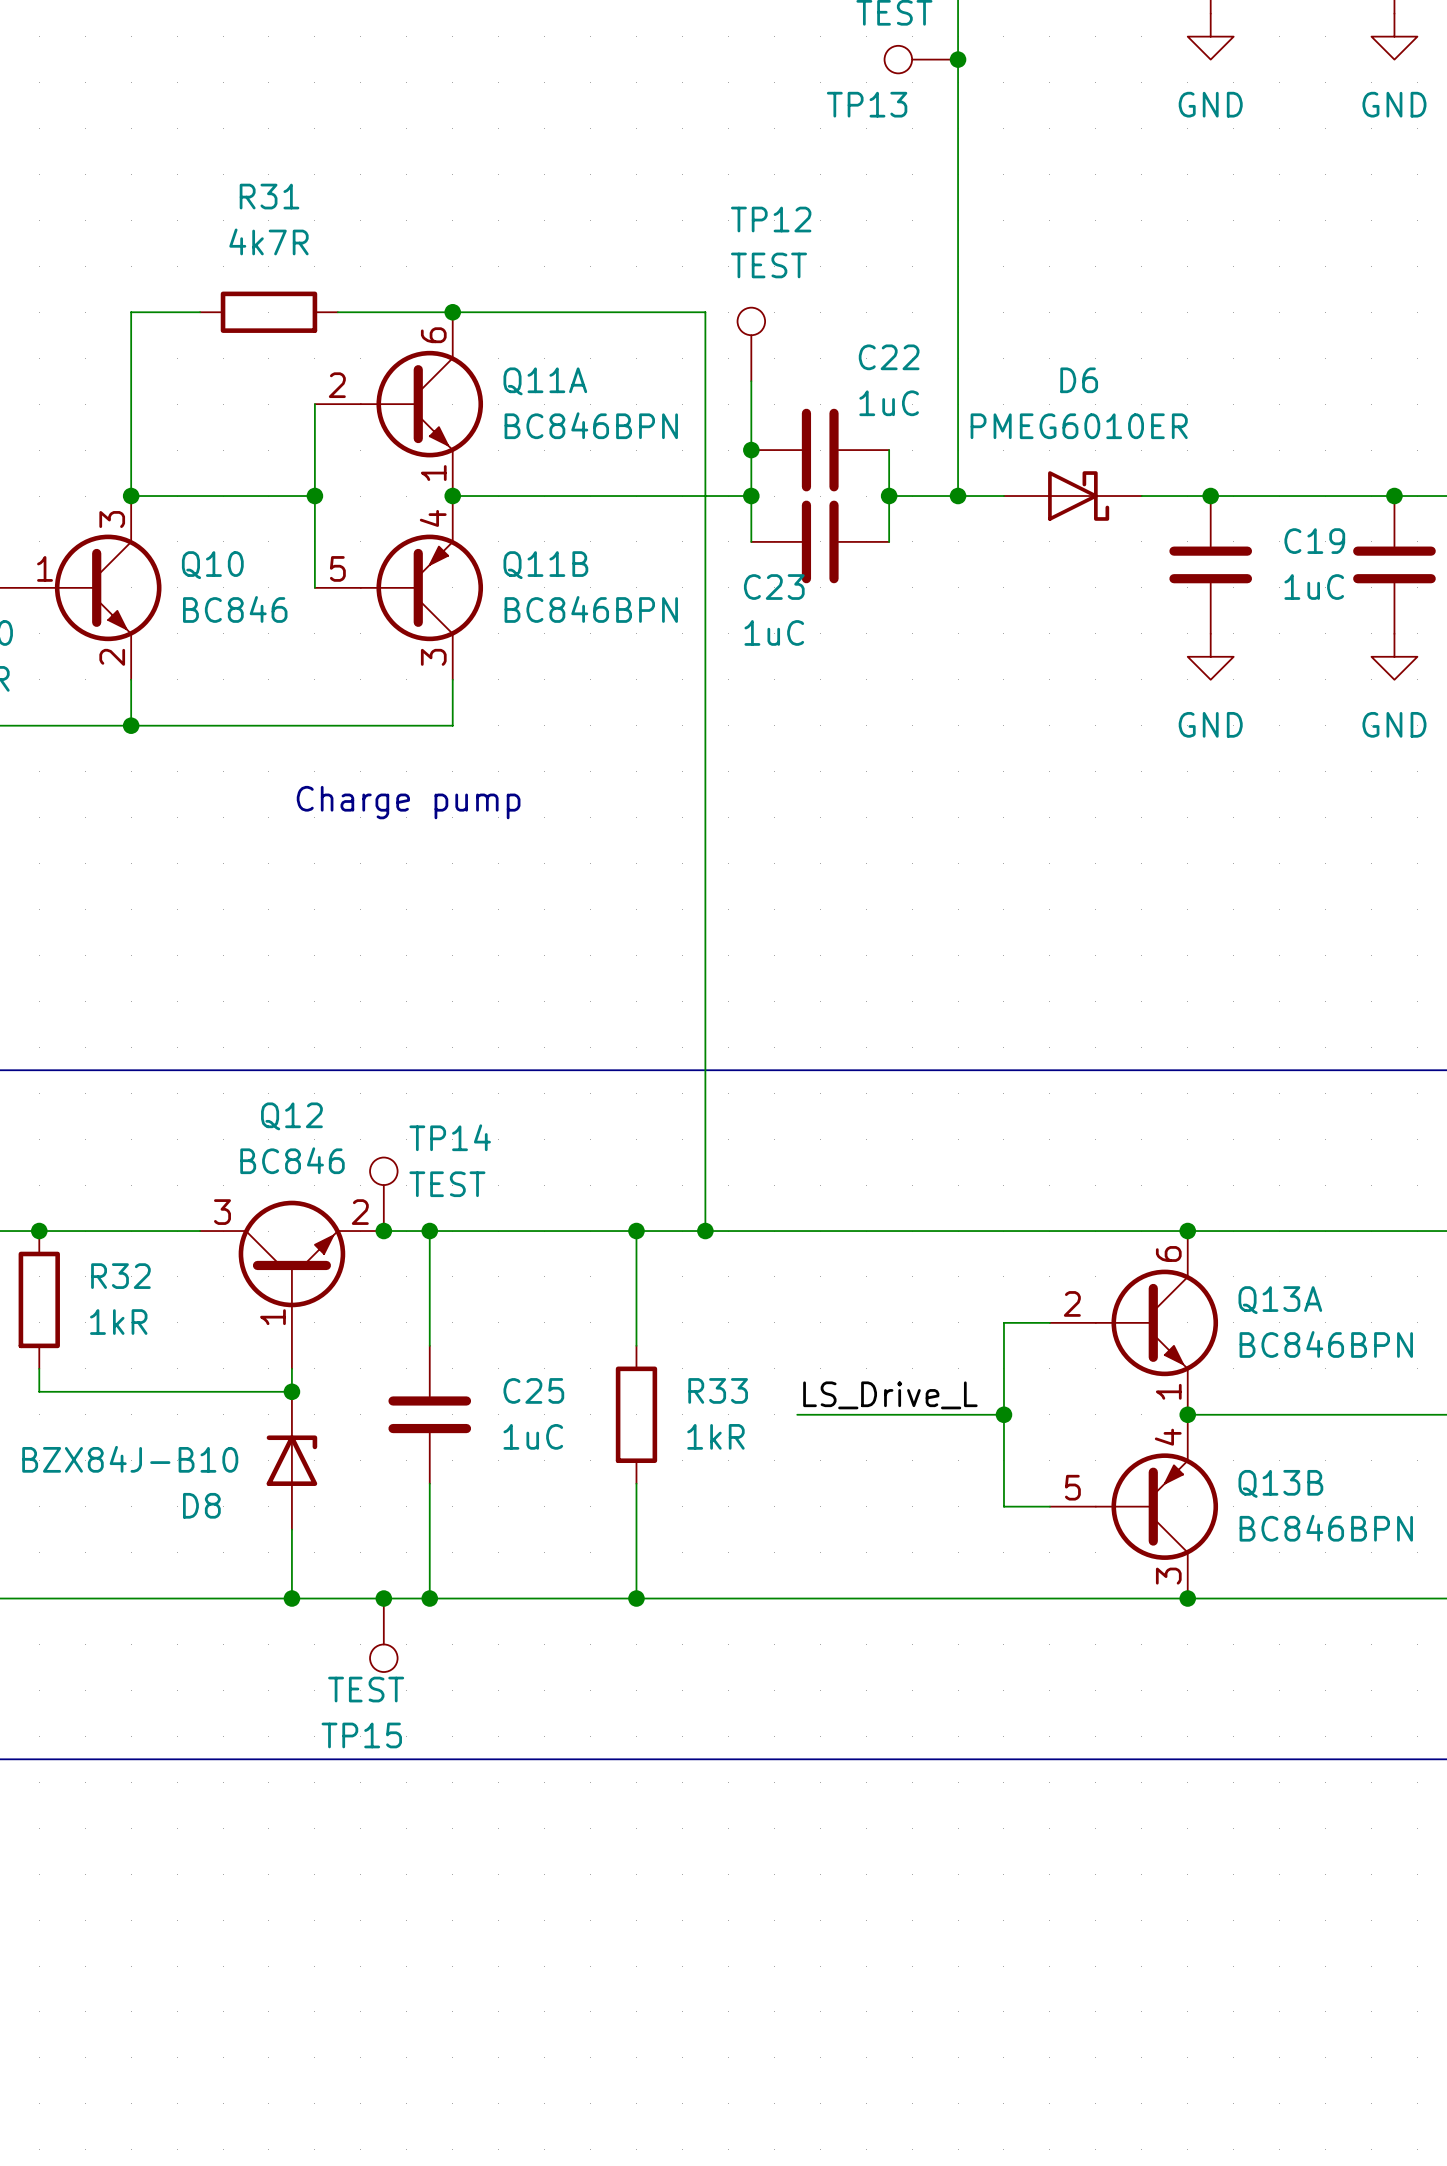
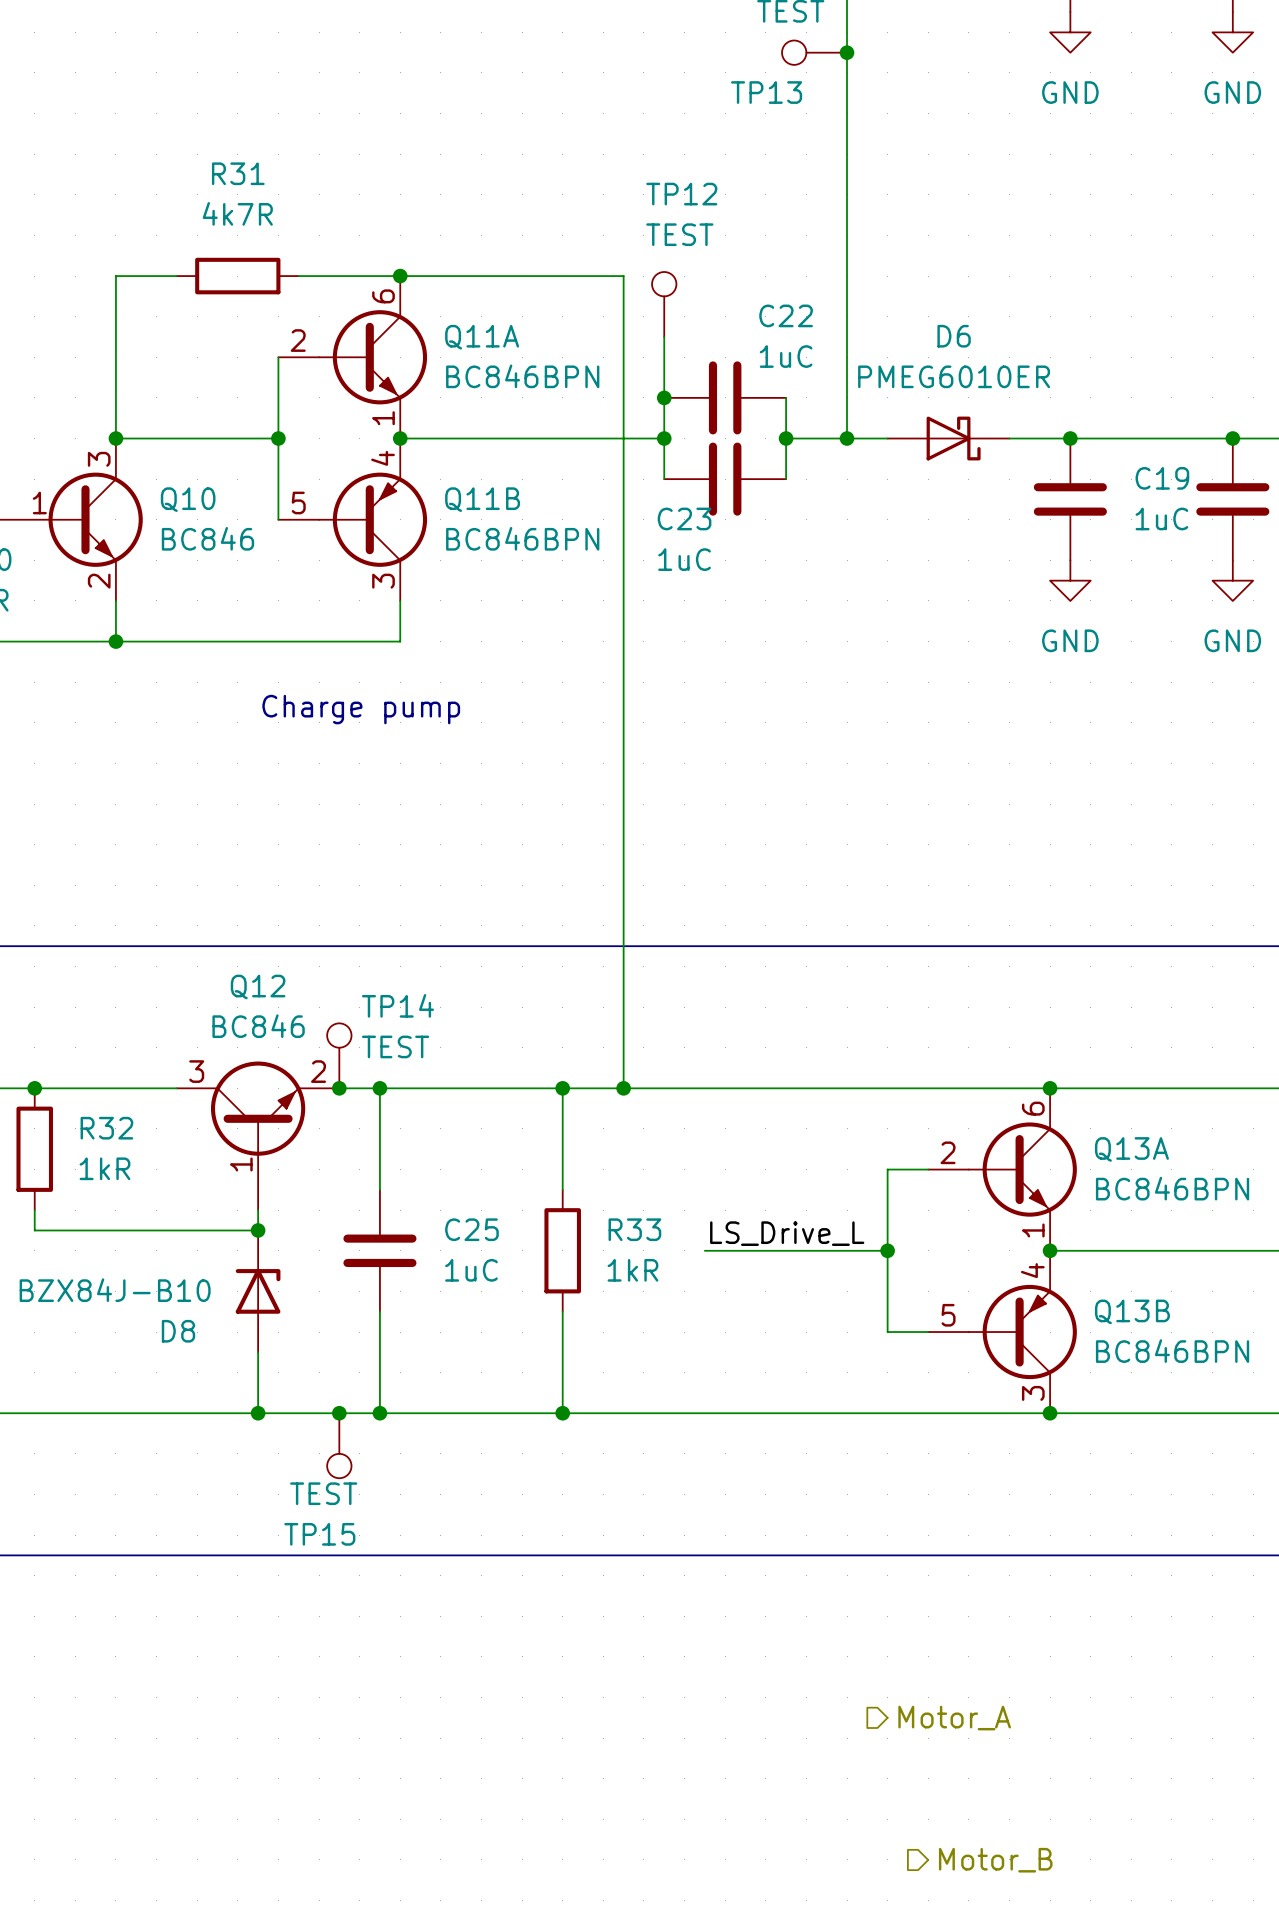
hierarchical label: none -> Motor_A (954, 1718)
hierarchical label: none -> Motor_B (995, 1860)

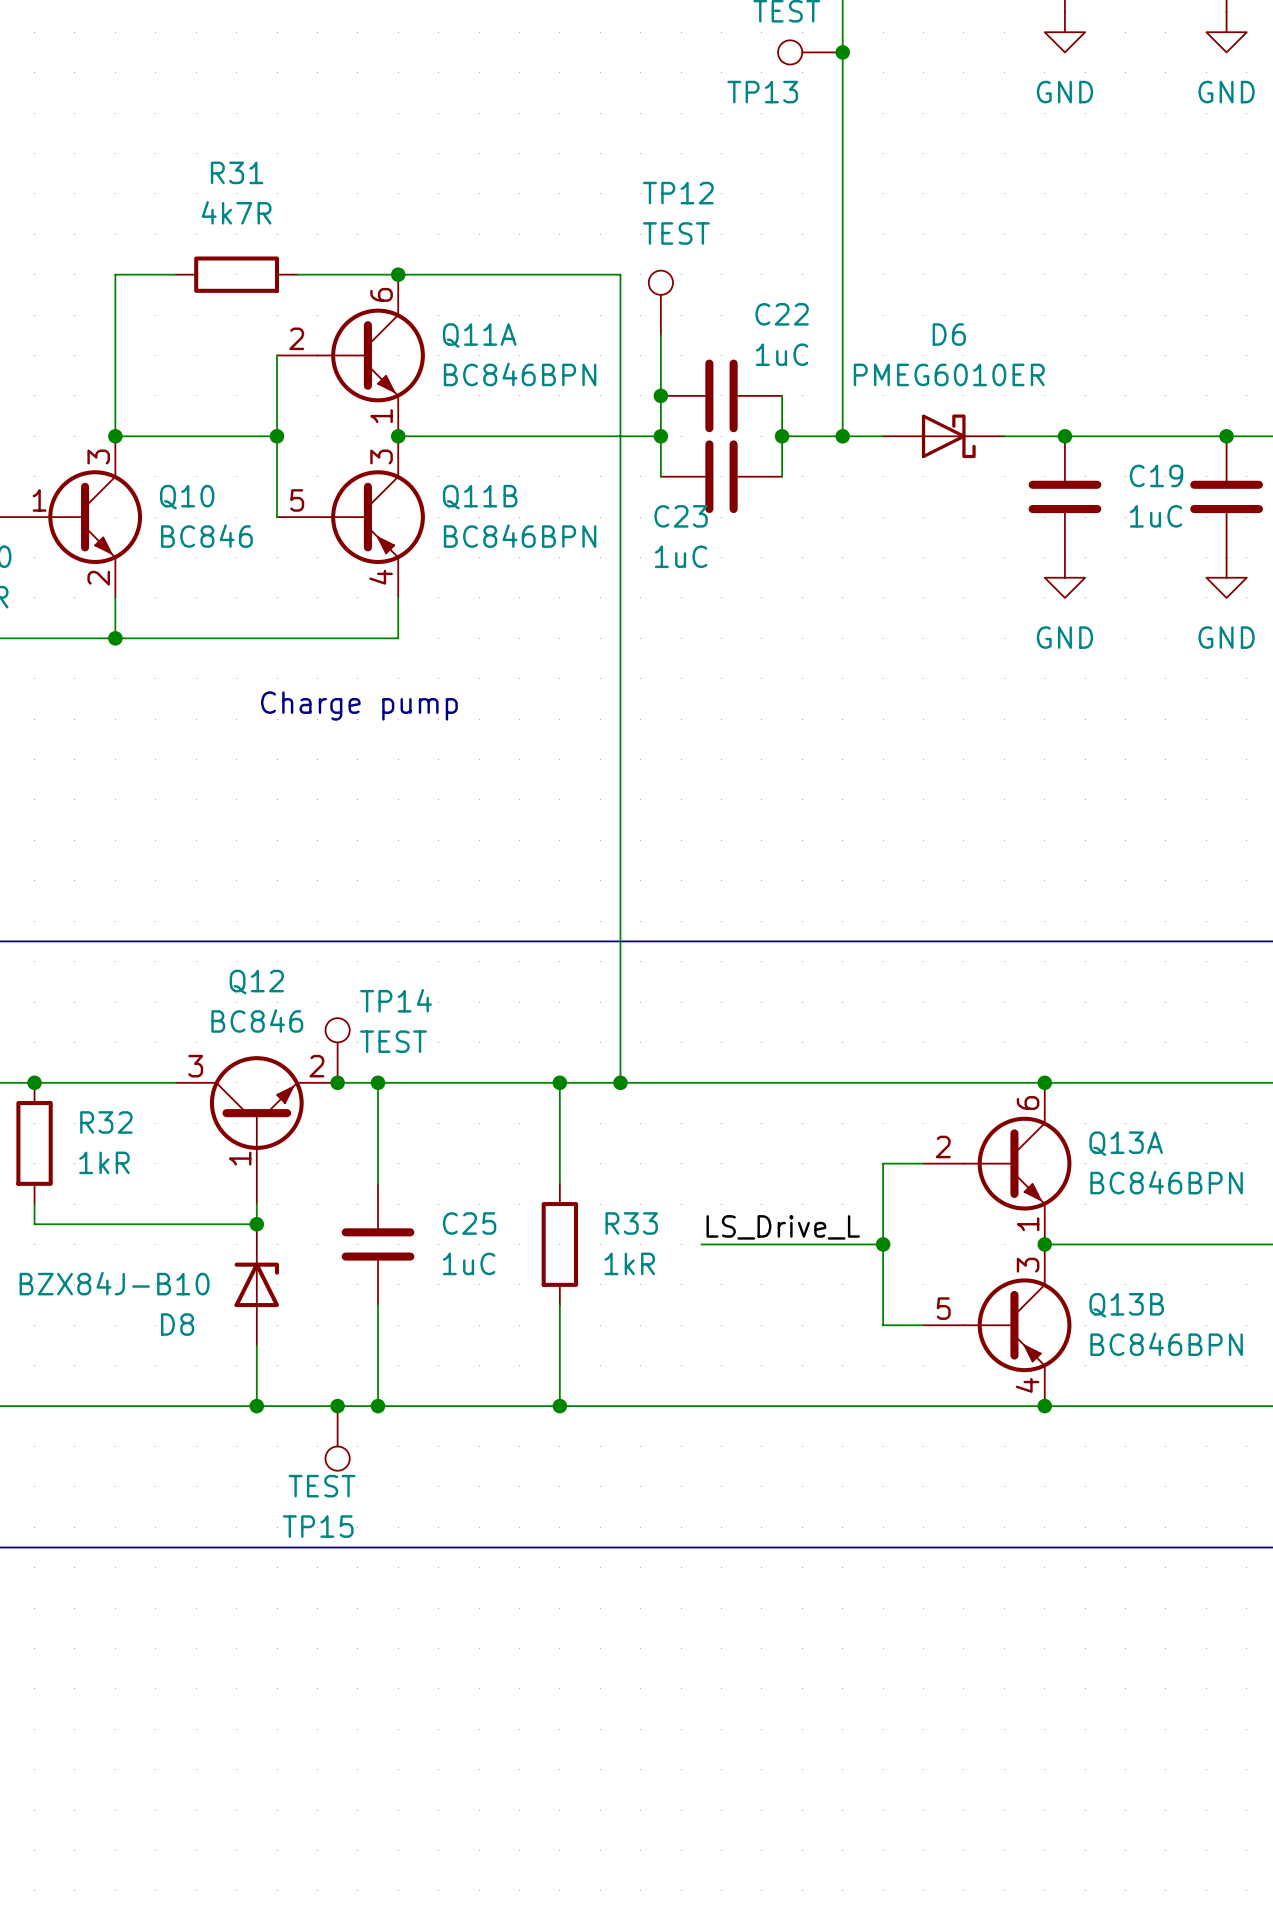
Q11B flip: as is (373, 519) -> up-down (371, 517)
Q13B flip: as is (1022, 1332) -> up-down (1017, 1325)
hierarchical label: Motor_A (954, 1718) -> none
hierarchical label: Motor_B (995, 1860) -> none

